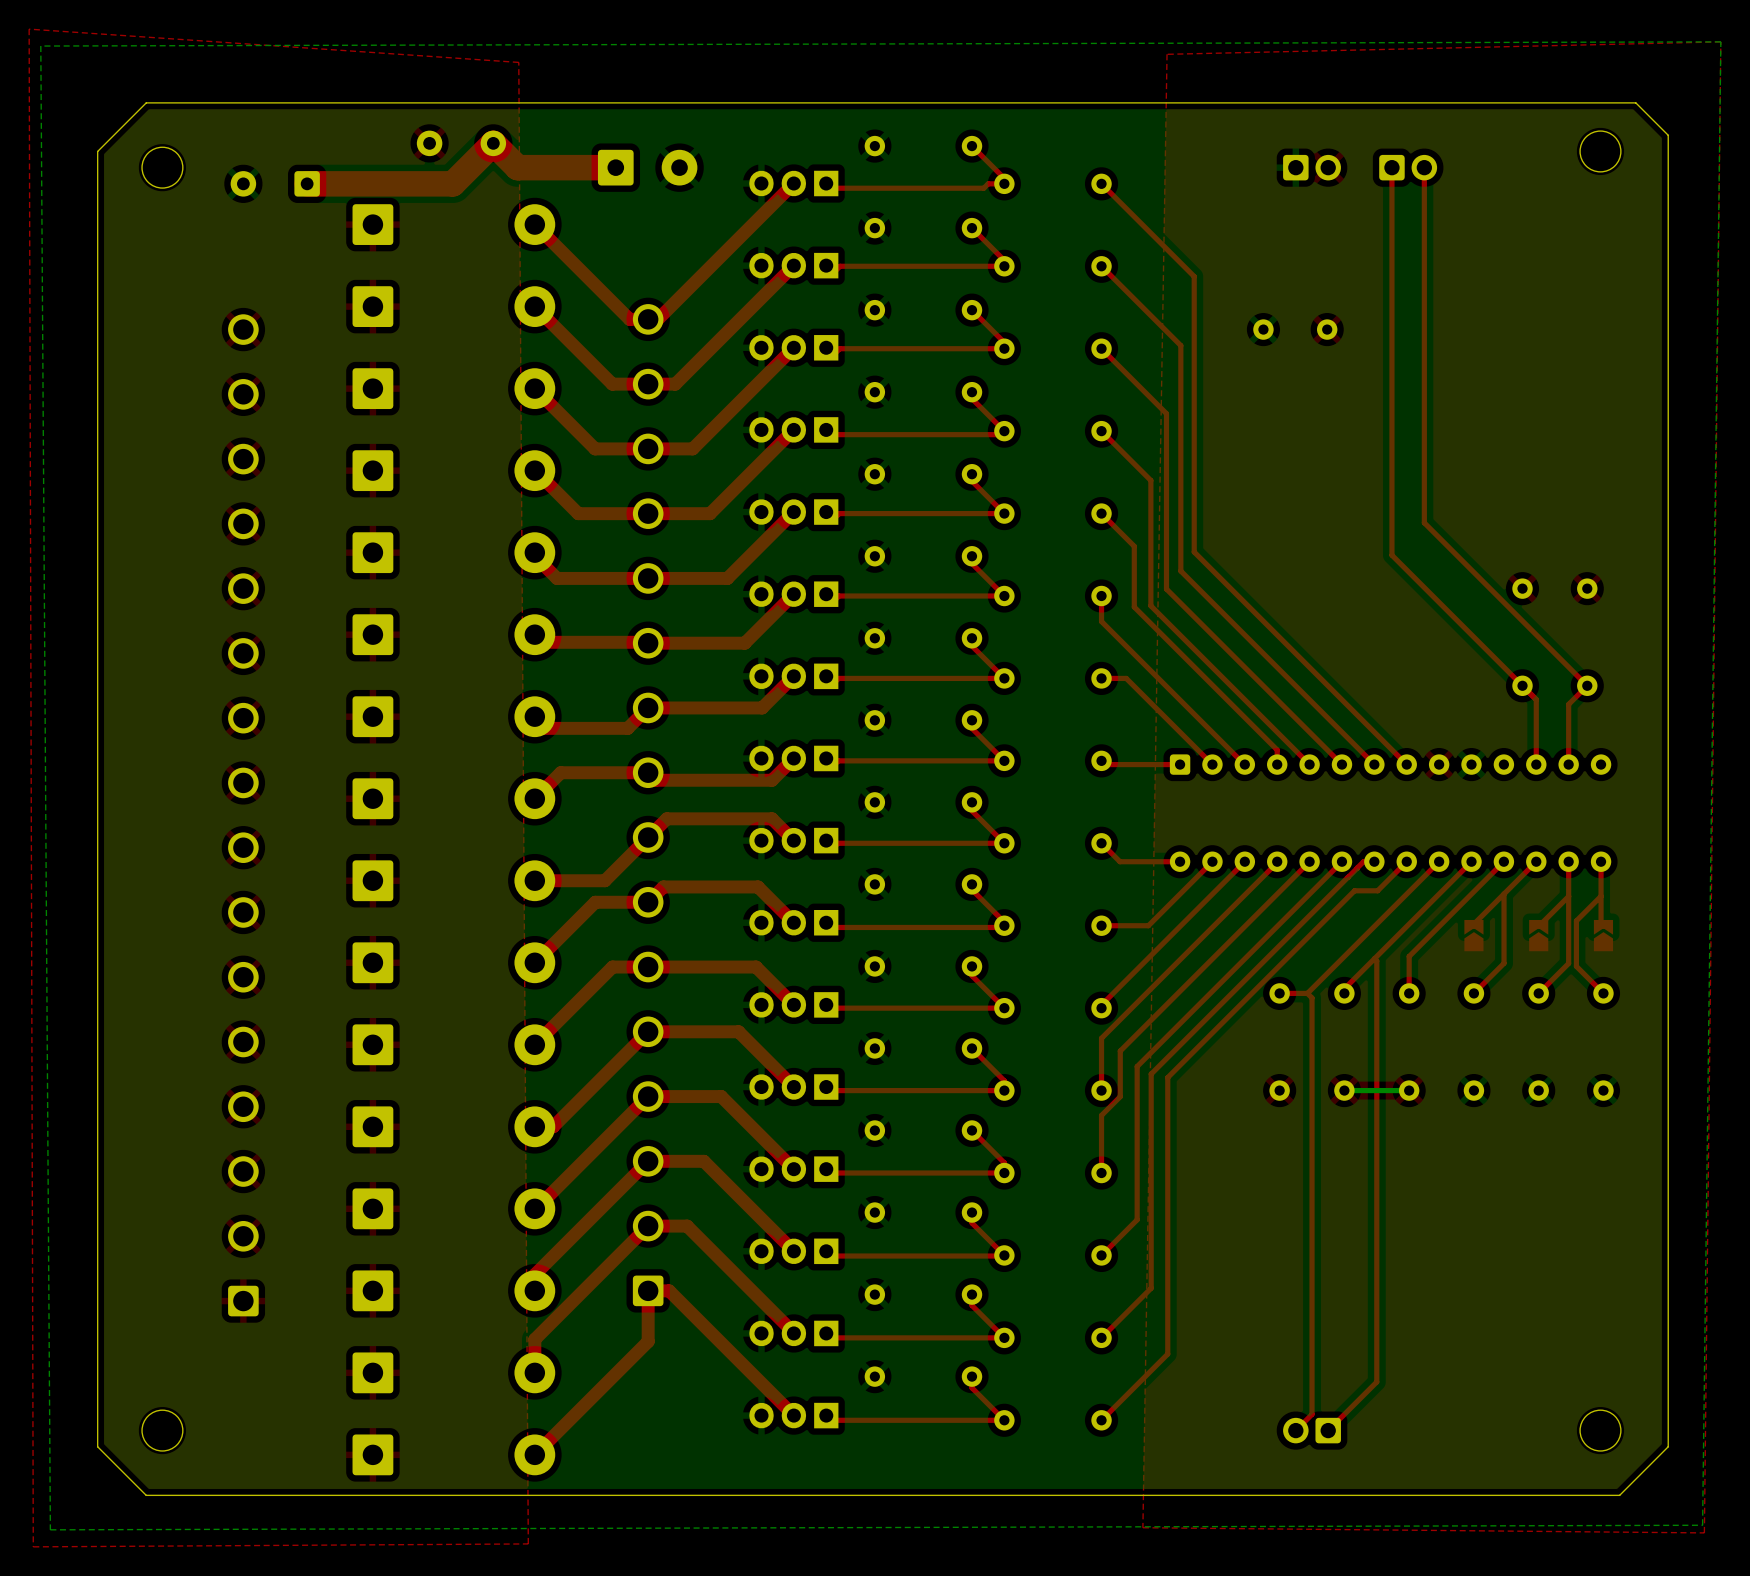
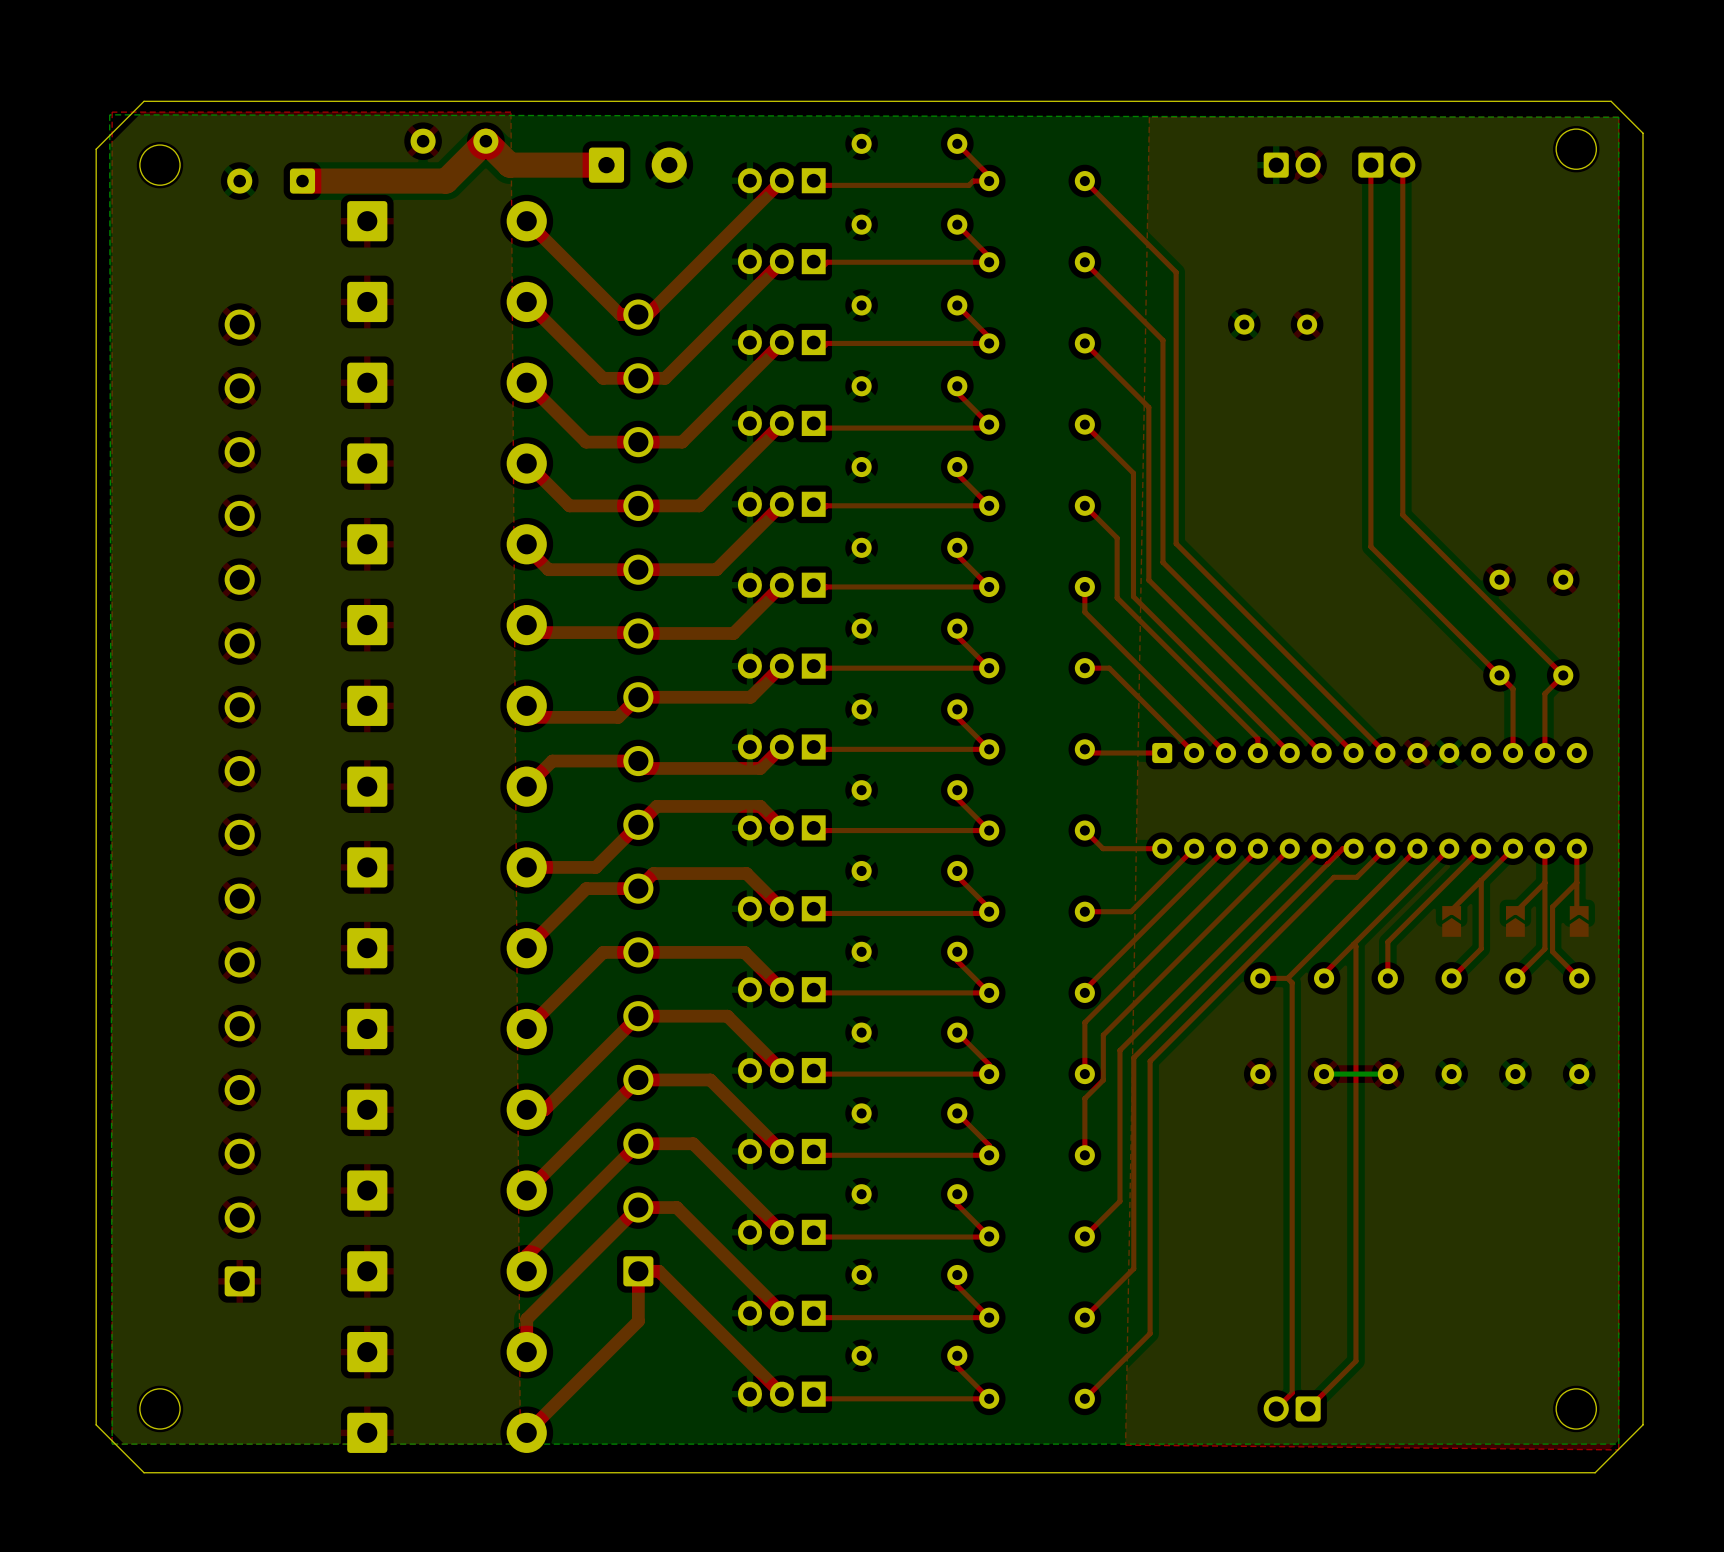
top zone outline: (29, 29) (33, 1546) (528, 1543) (518, 62) (29, 29) -> (510, 112) (520, 1444) (112, 1444) (112, 112) (510, 112)
top zone outline: (1720, 41) (1167, 54) (1142, 1527) (1704, 1532) (1720, 41) -> (1618, 117) (1618, 1449) (1125, 1445) (1149, 117) (1618, 117)
bottom zone outline: (1720, 41) (40, 46) (50, 1529) (1702, 1525) (1720, 41) -> (109, 114) (1618, 117) (1618, 1444) (112, 1444) (109, 114)

